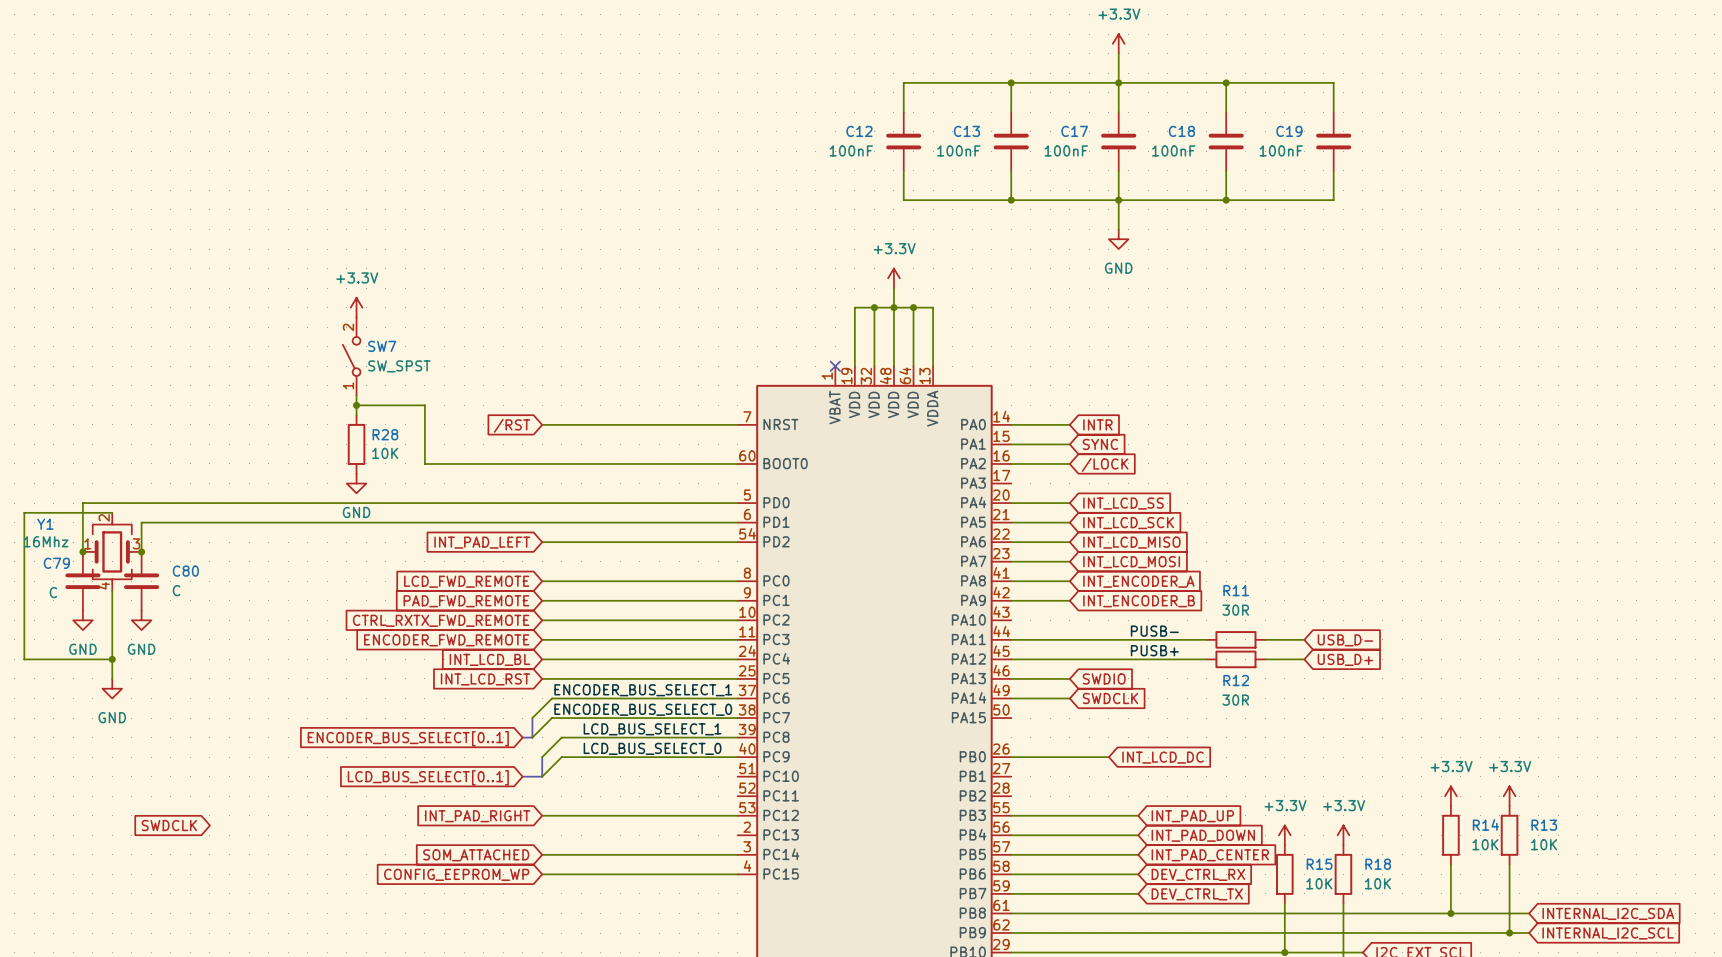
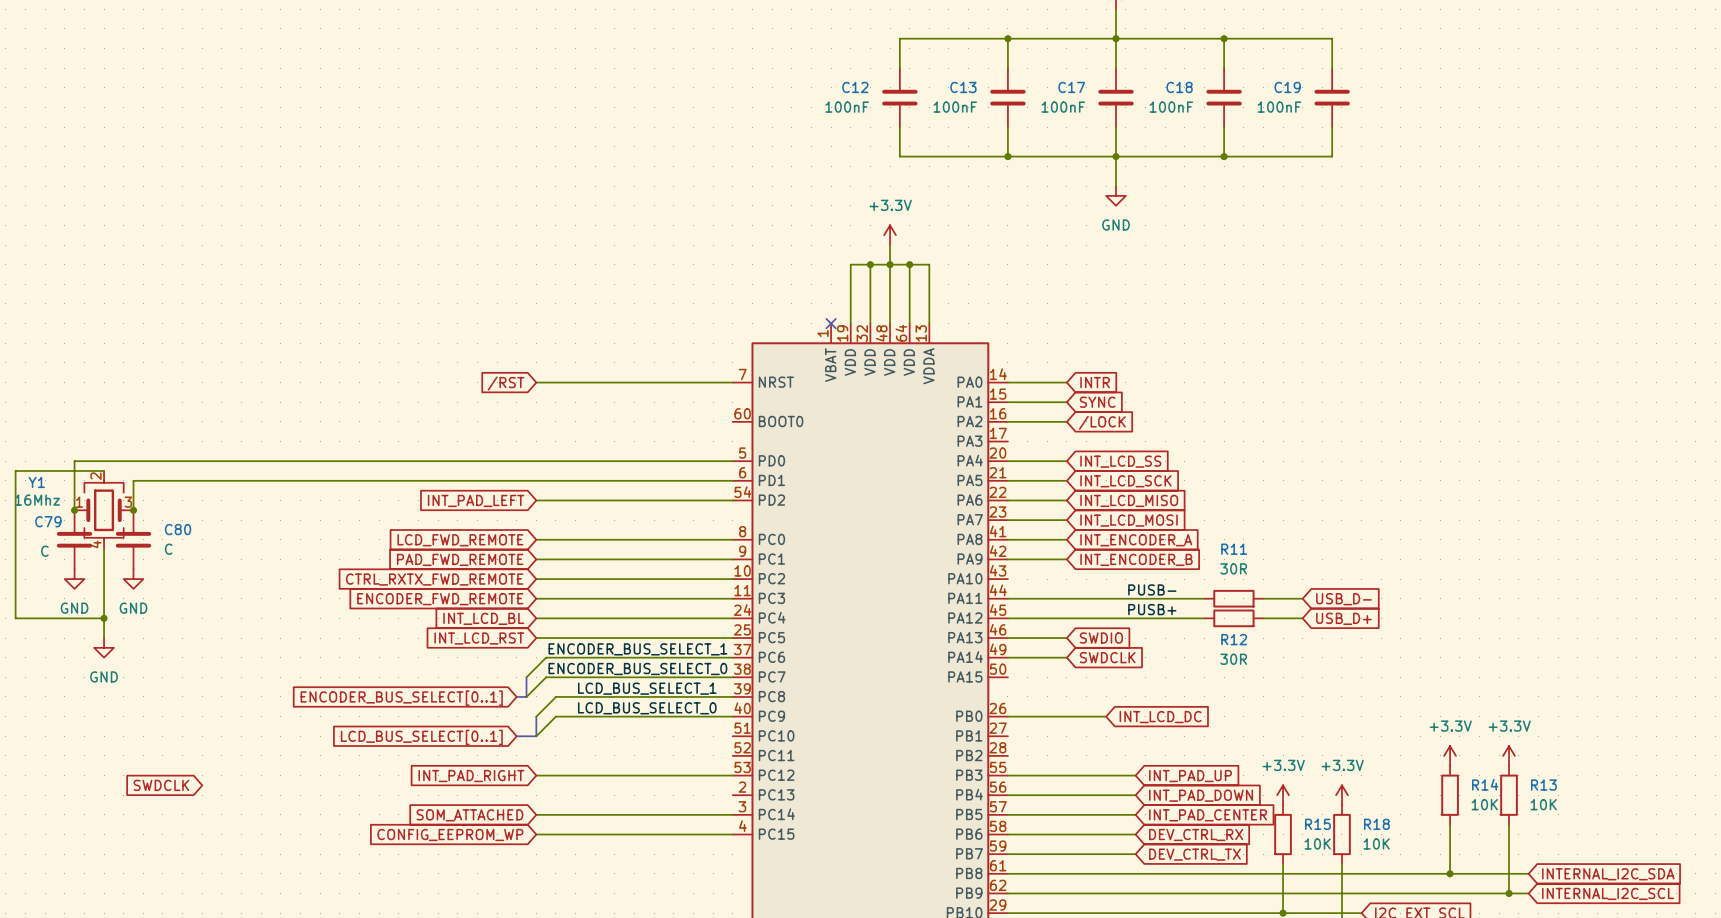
power symbol: +3.3V (356, 307) -> none
SW7: SW_SPST (351, 356) -> none
wire: (356, 395) (356, 415) -> none
wire: (356, 405) (424, 405) (424, 463) (737, 463) -> none
junction: (356, 405) -> none
R28: 10K (356, 444) -> none
power symbol: GND (356, 483) -> none

